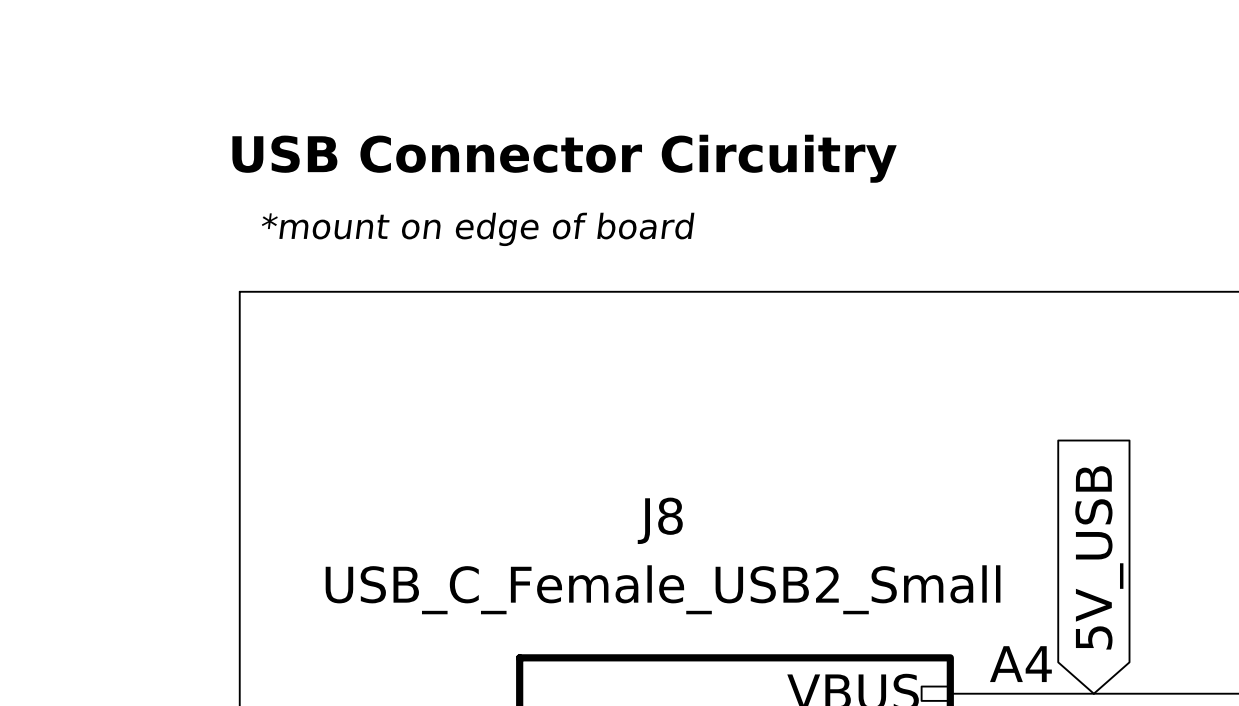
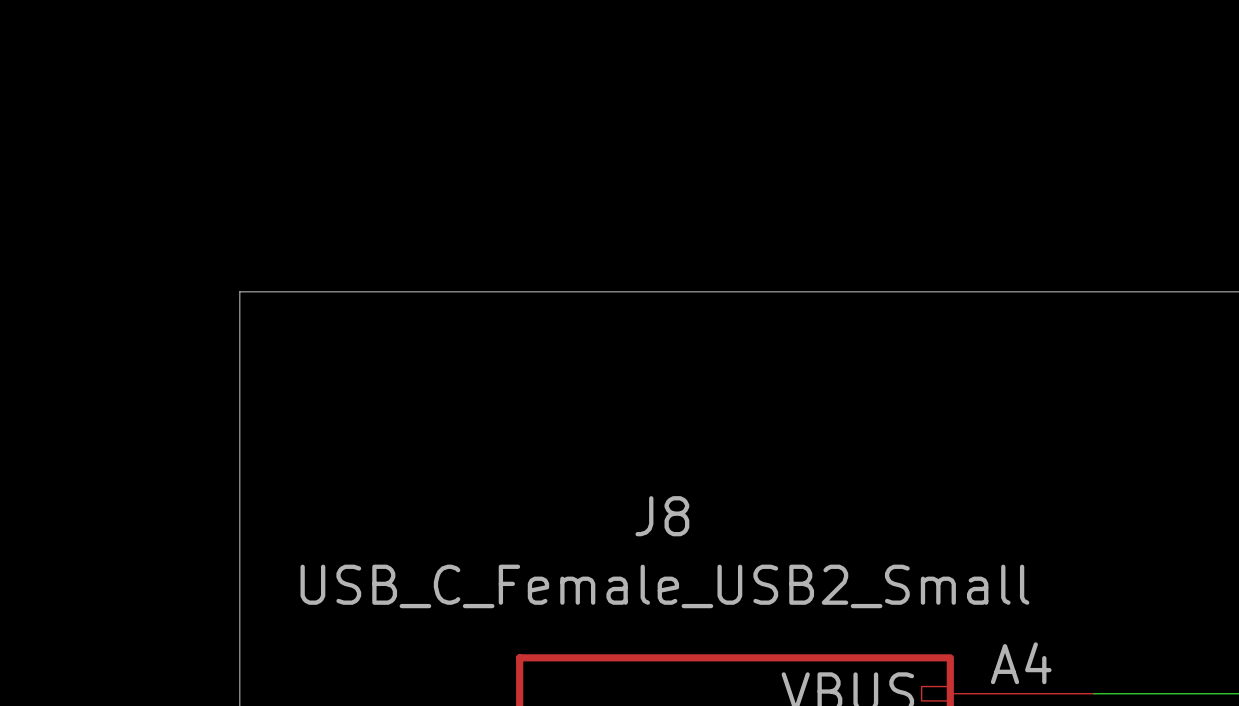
text: USB Connector Circuitry (564, 158) -> none
text: *mount on edge of board (478, 229) -> none
global label: 5V_USB (1099, 557) -> none

